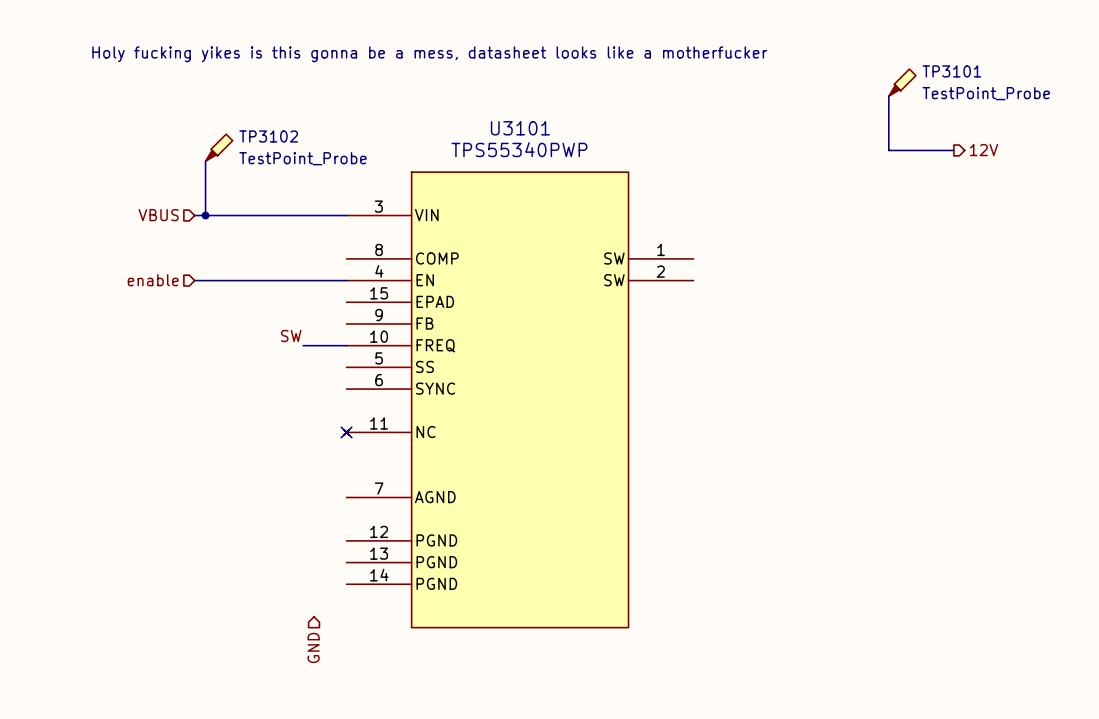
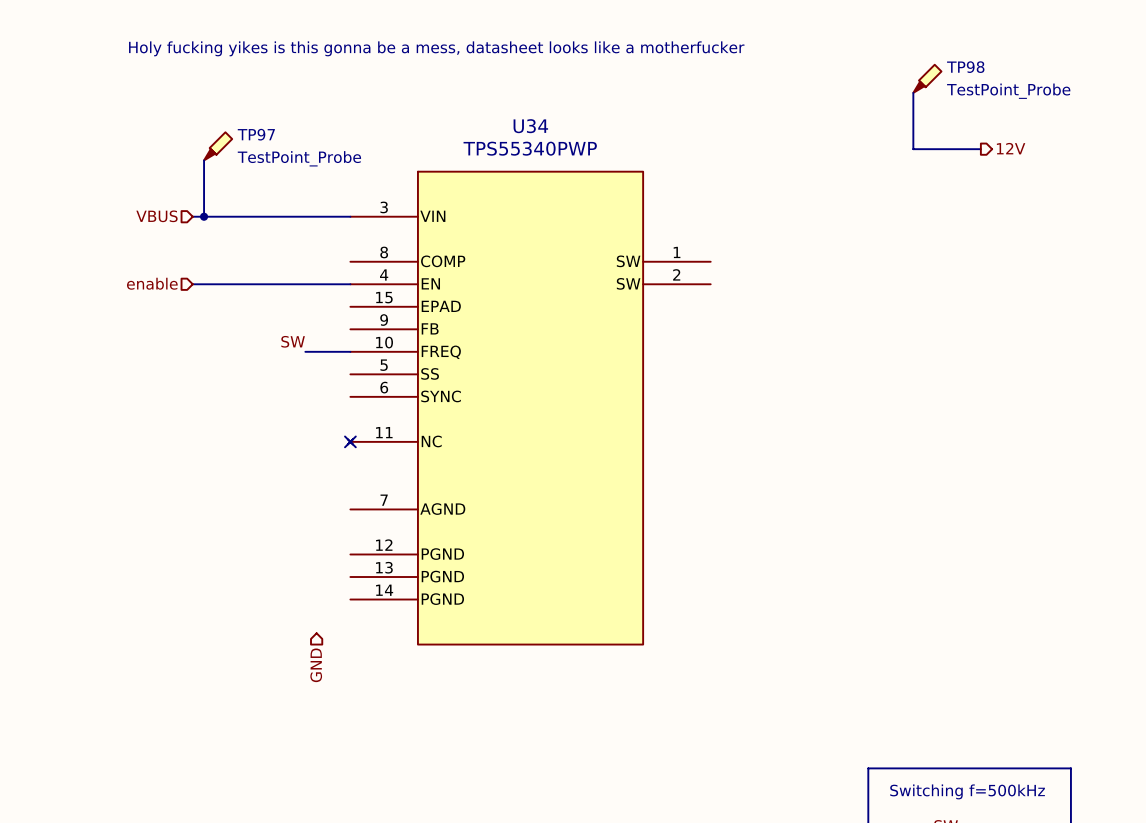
TP3101 name: TP3101 (951, 71) -> TP98 (965, 67)
U3101 name: U3101 (520, 128) -> U34 (530, 126)
TP3102 name: TP3102 (268, 136) -> TP97 (256, 134)

